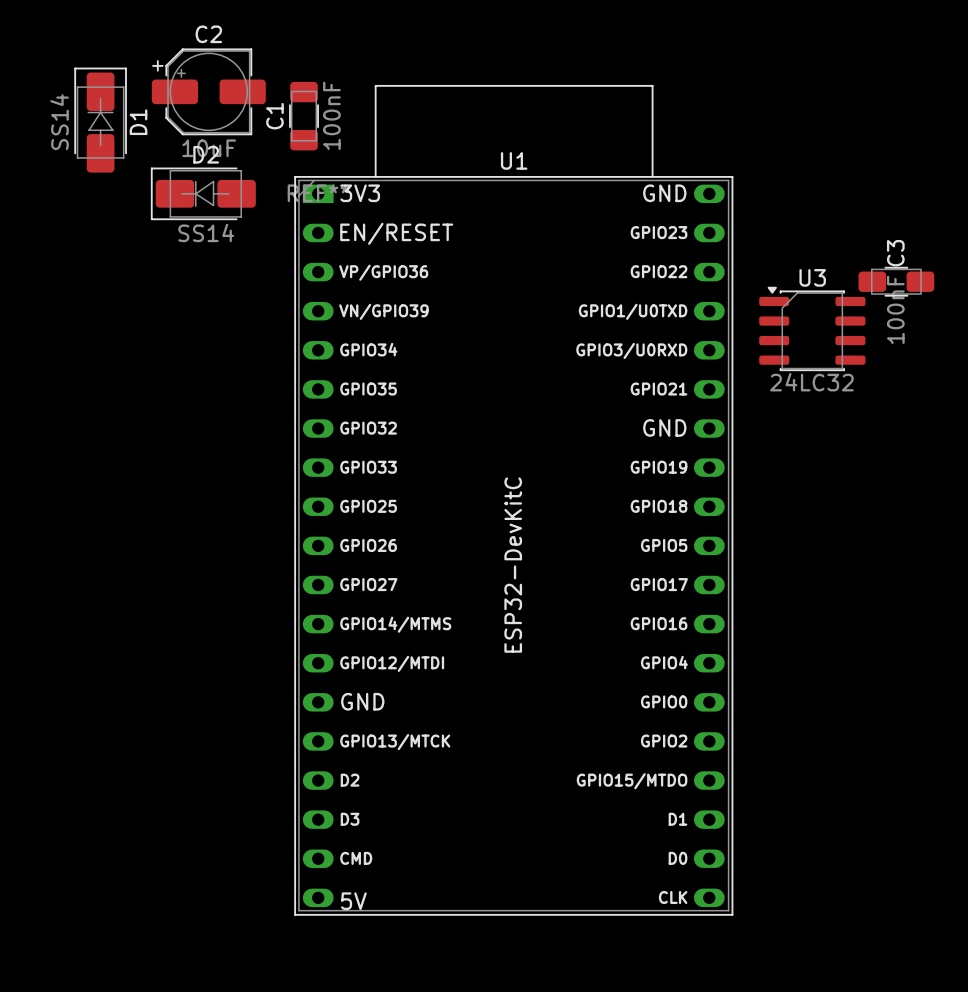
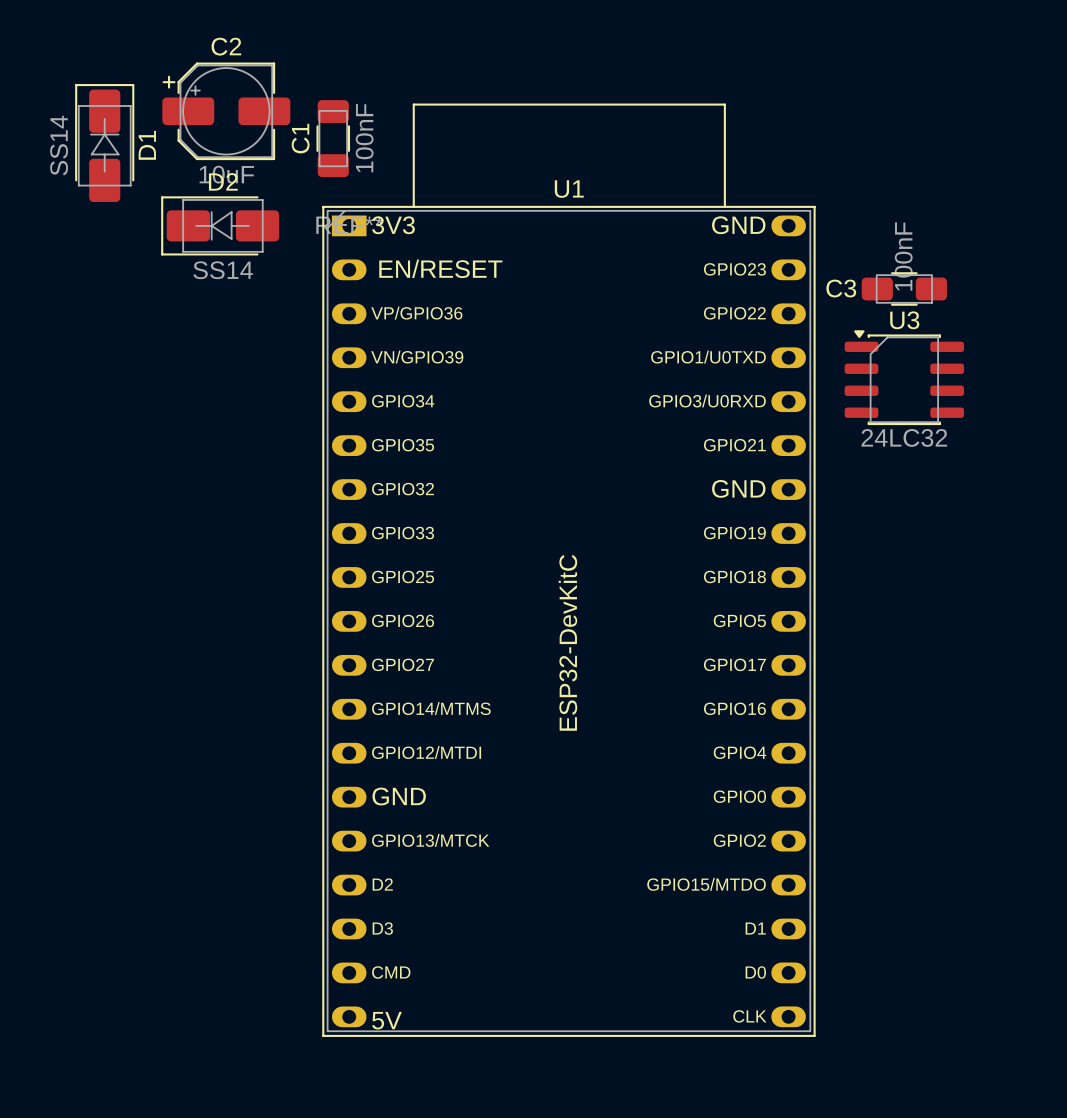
C3 name rotation: 0° (895, 253) -> 90° clockwise (841, 288)
C3 name position: C3 (895, 253) -> C3 (841, 288)
C3 position: (896, 281) -> (904, 288)
C3 value position: 100nF (895, 309) -> 100nF (903, 256)

